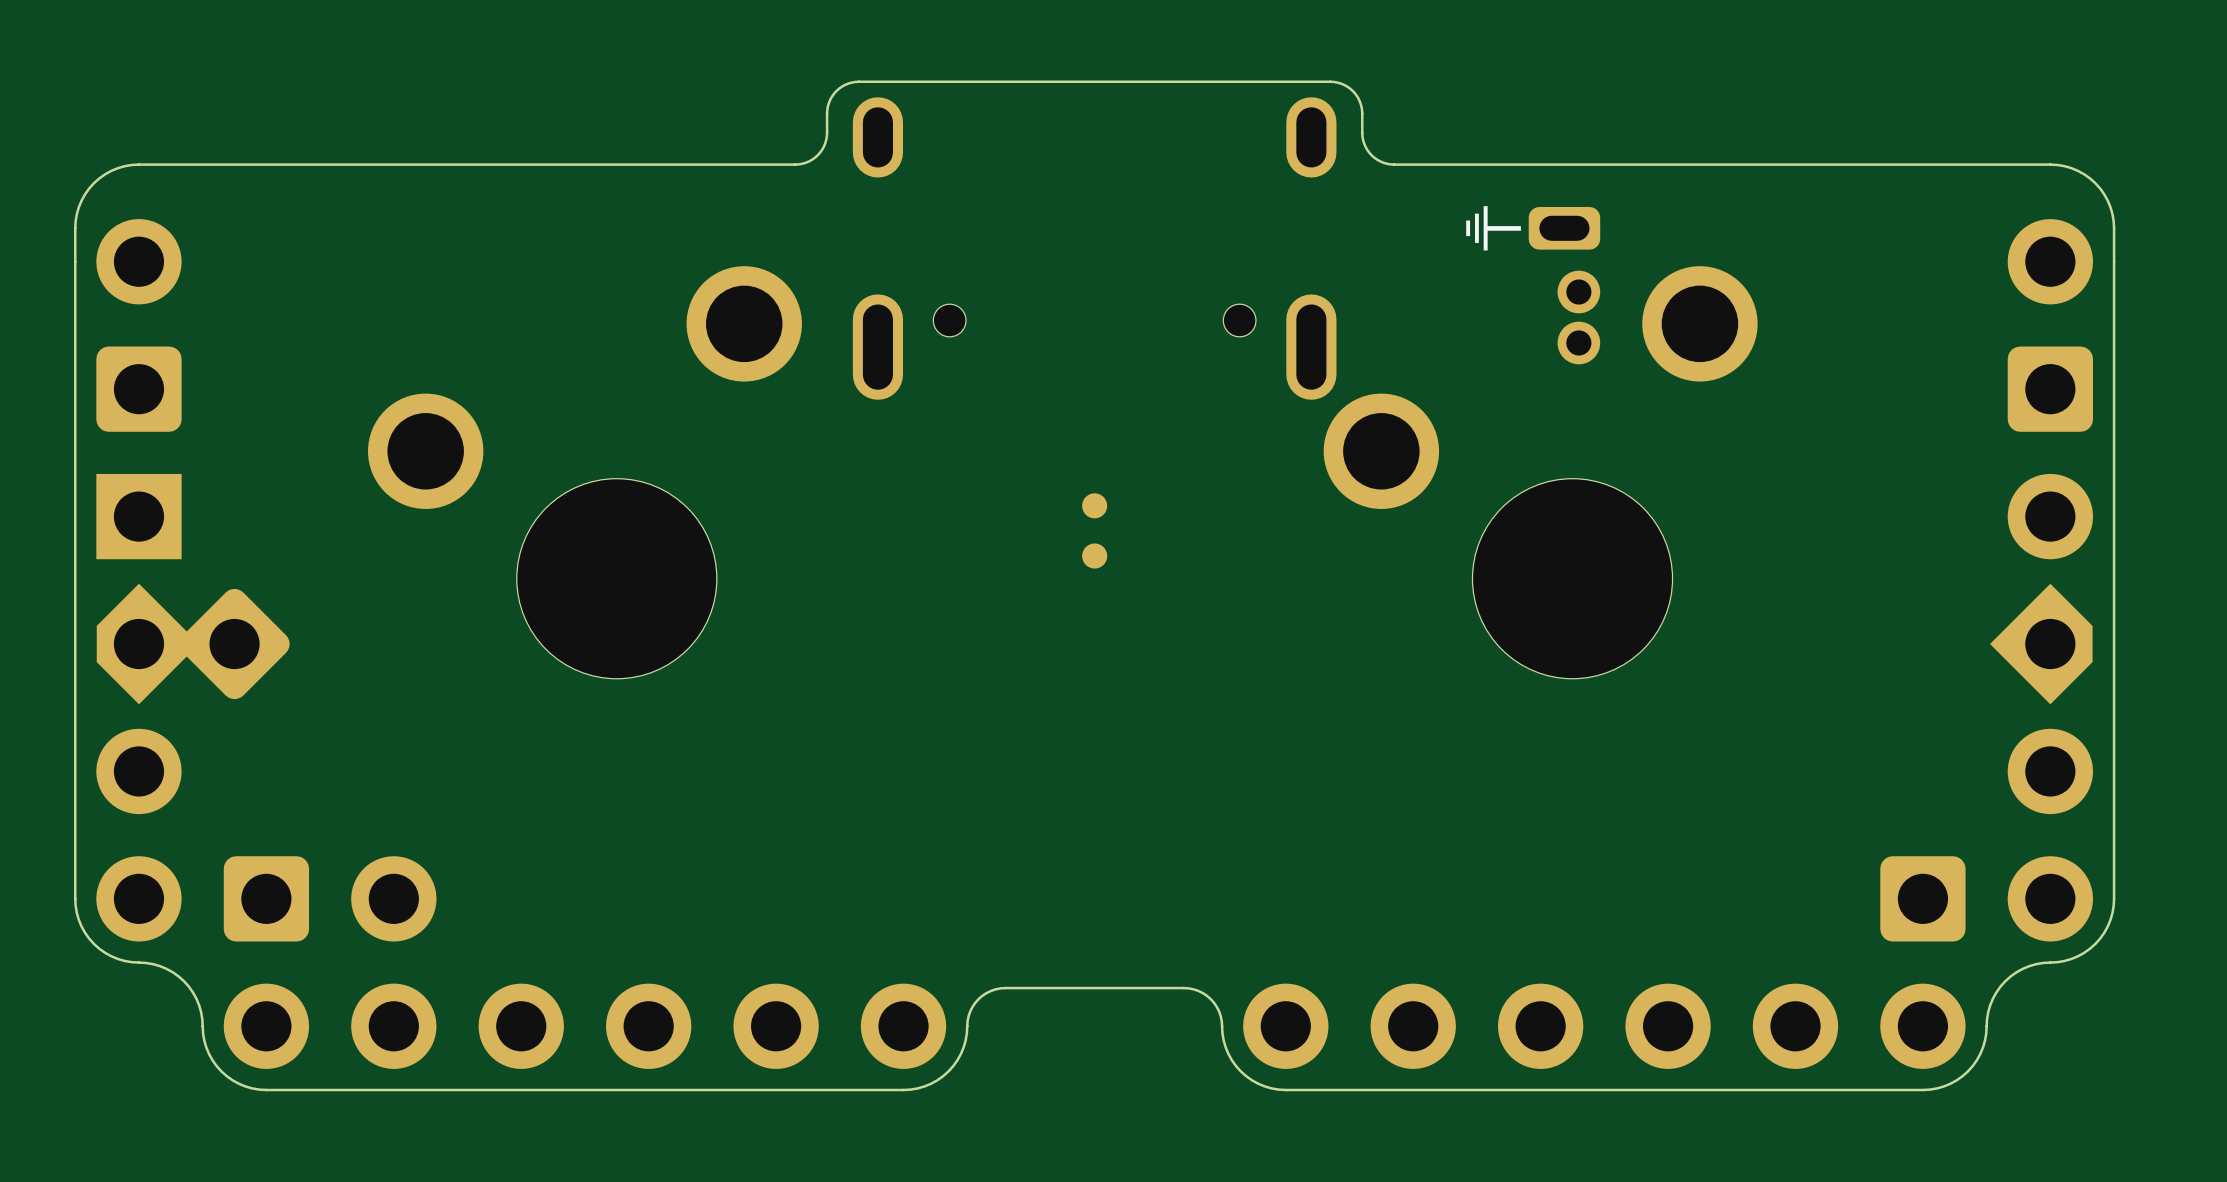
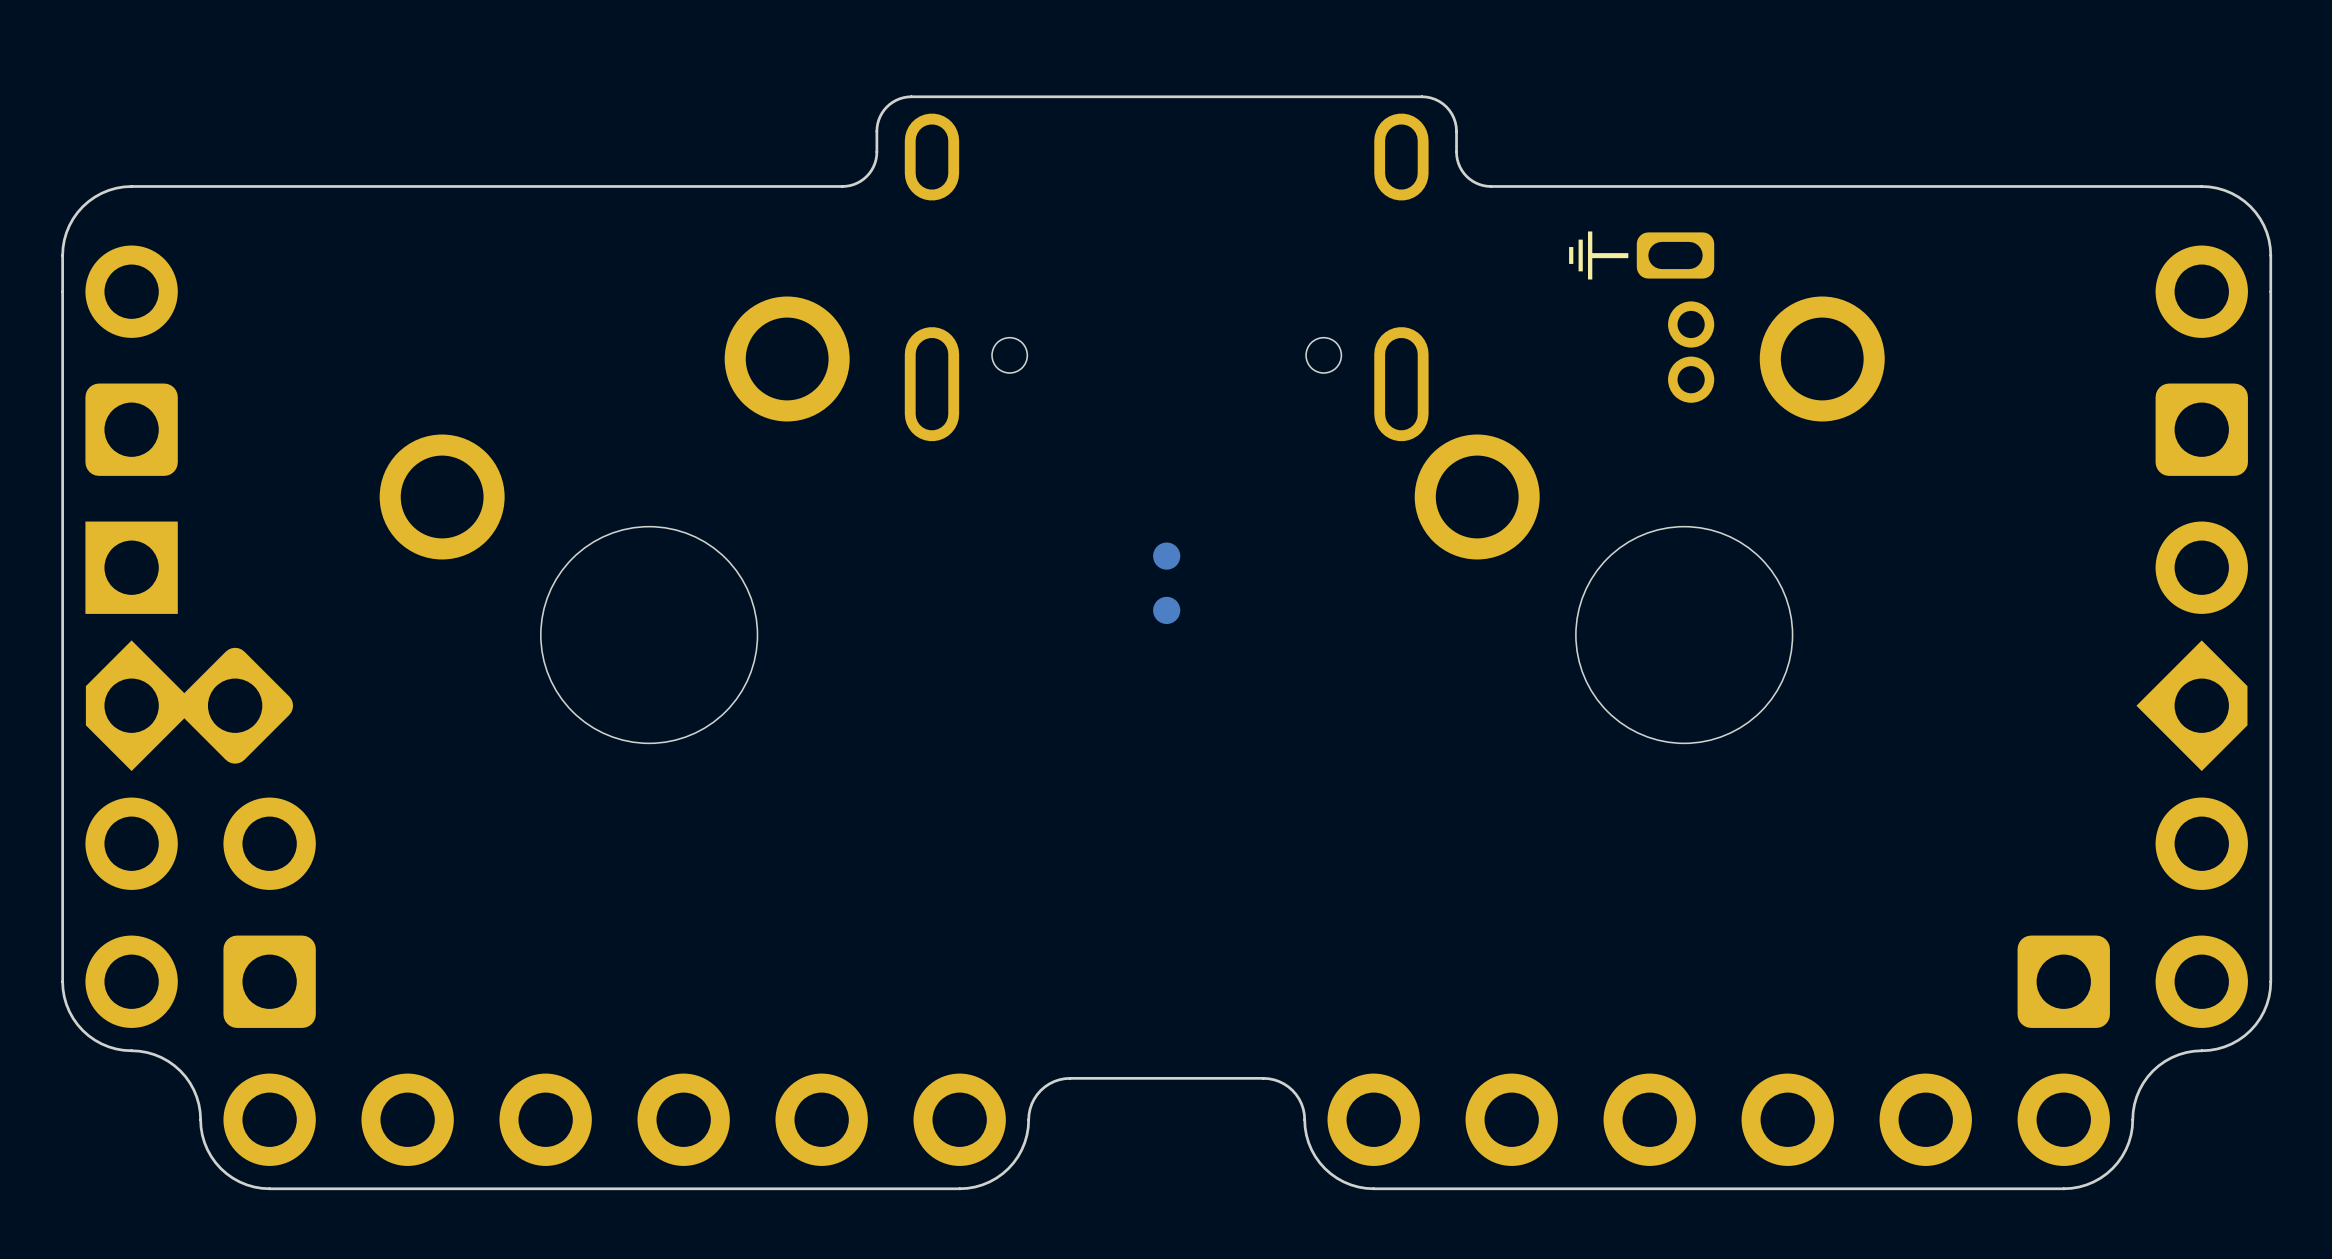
part footprint: [74, 219, 2116, 1092] -> [61, 245, 2273, 1191]

